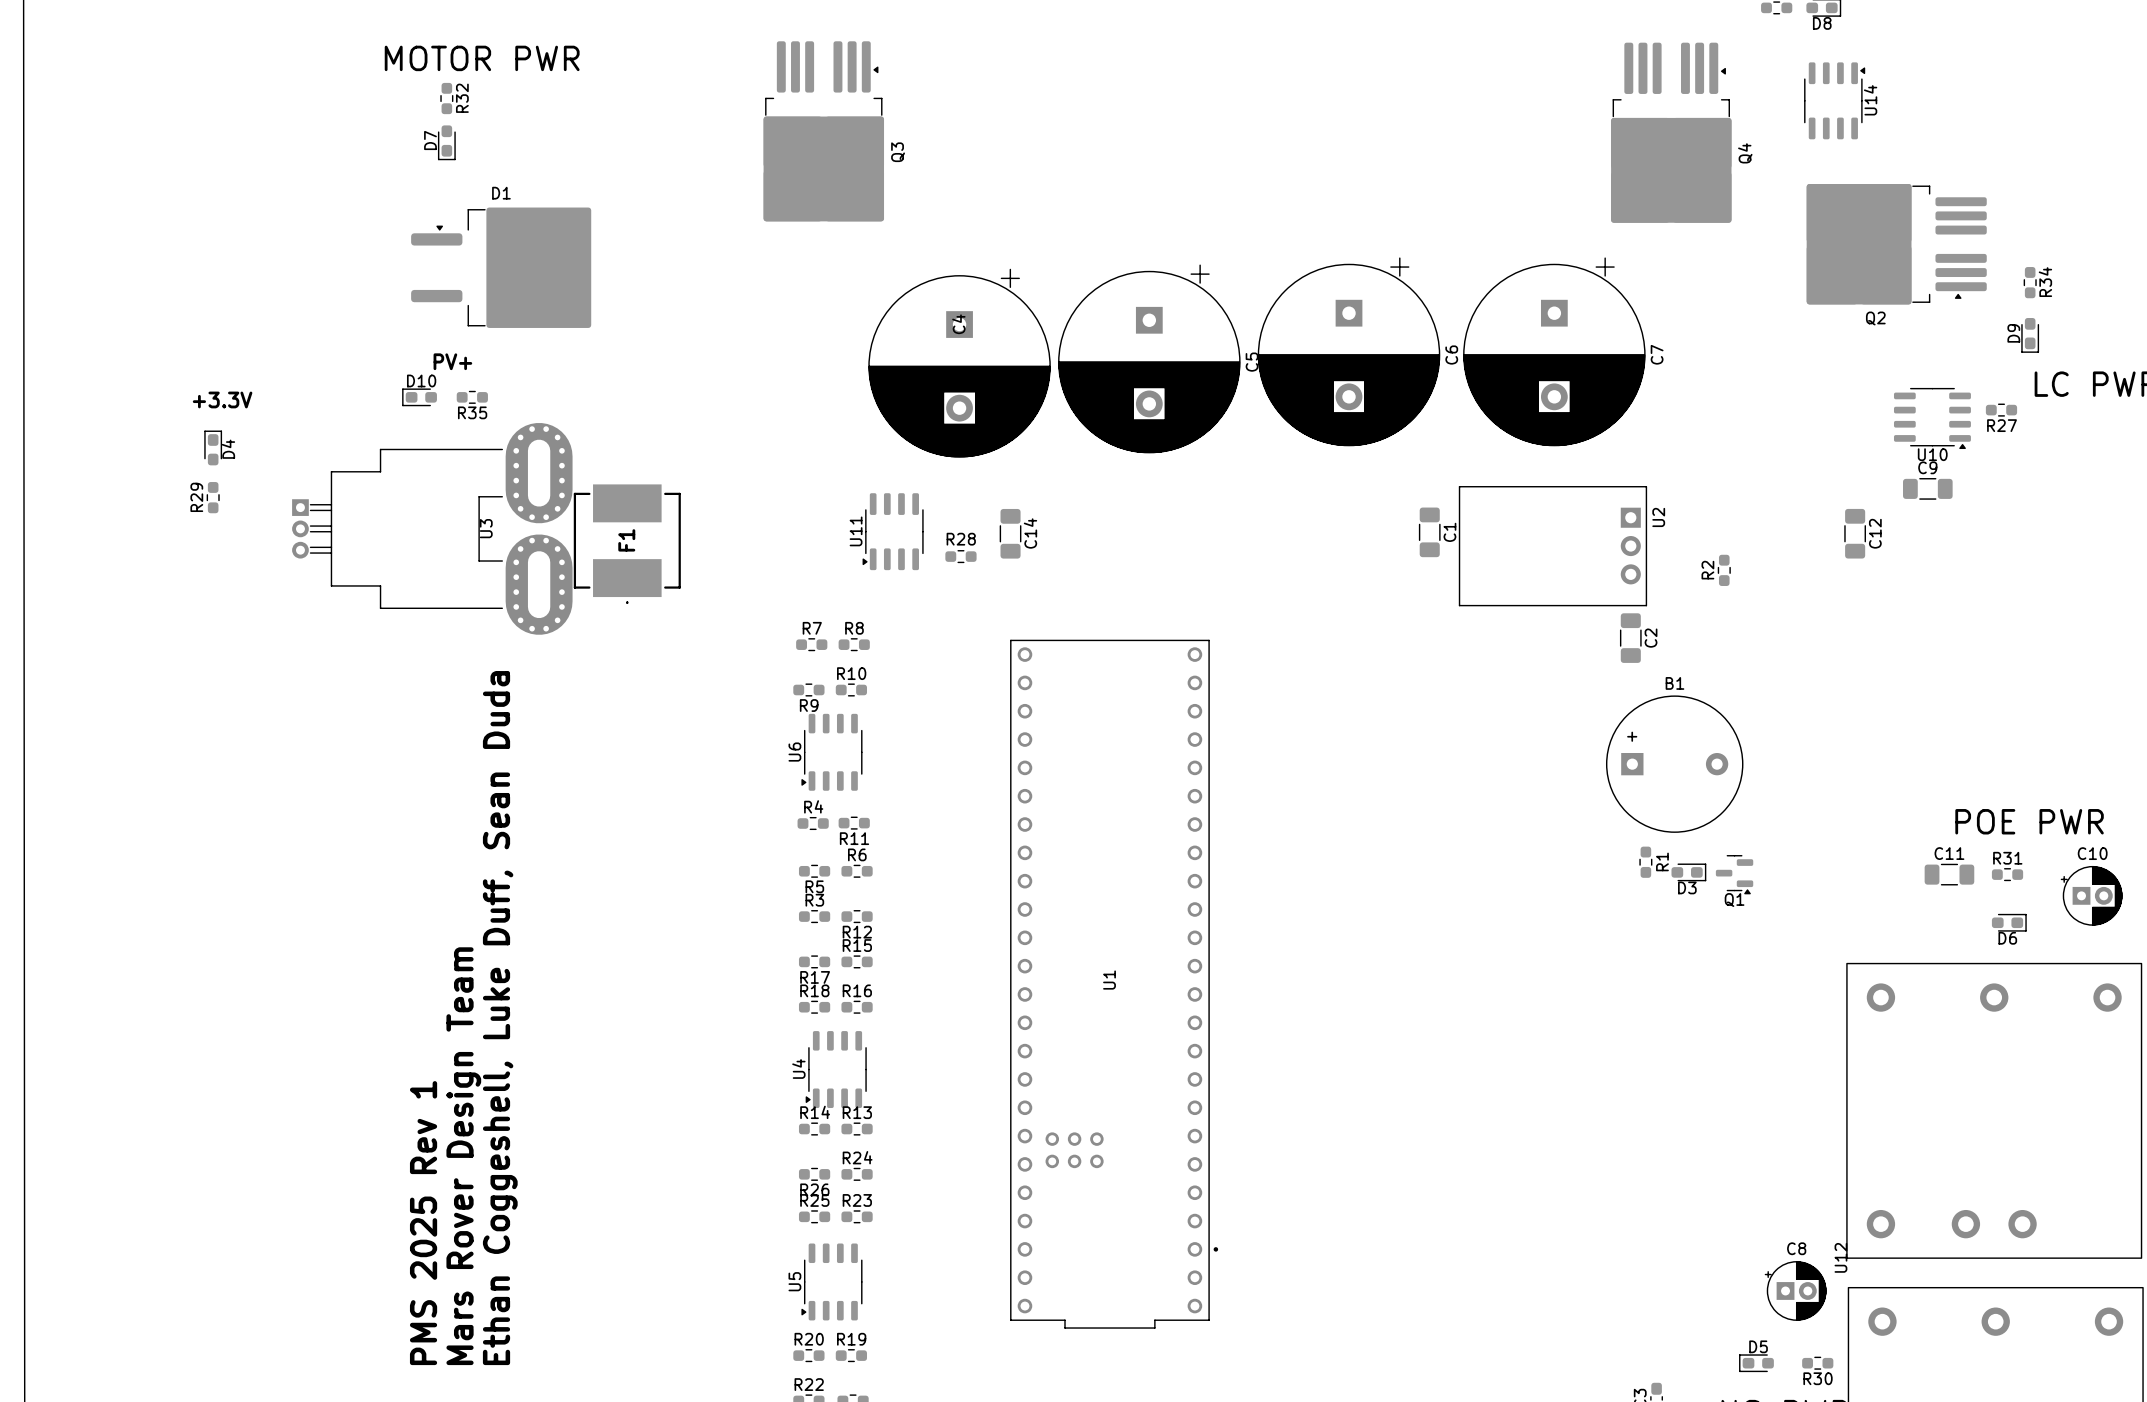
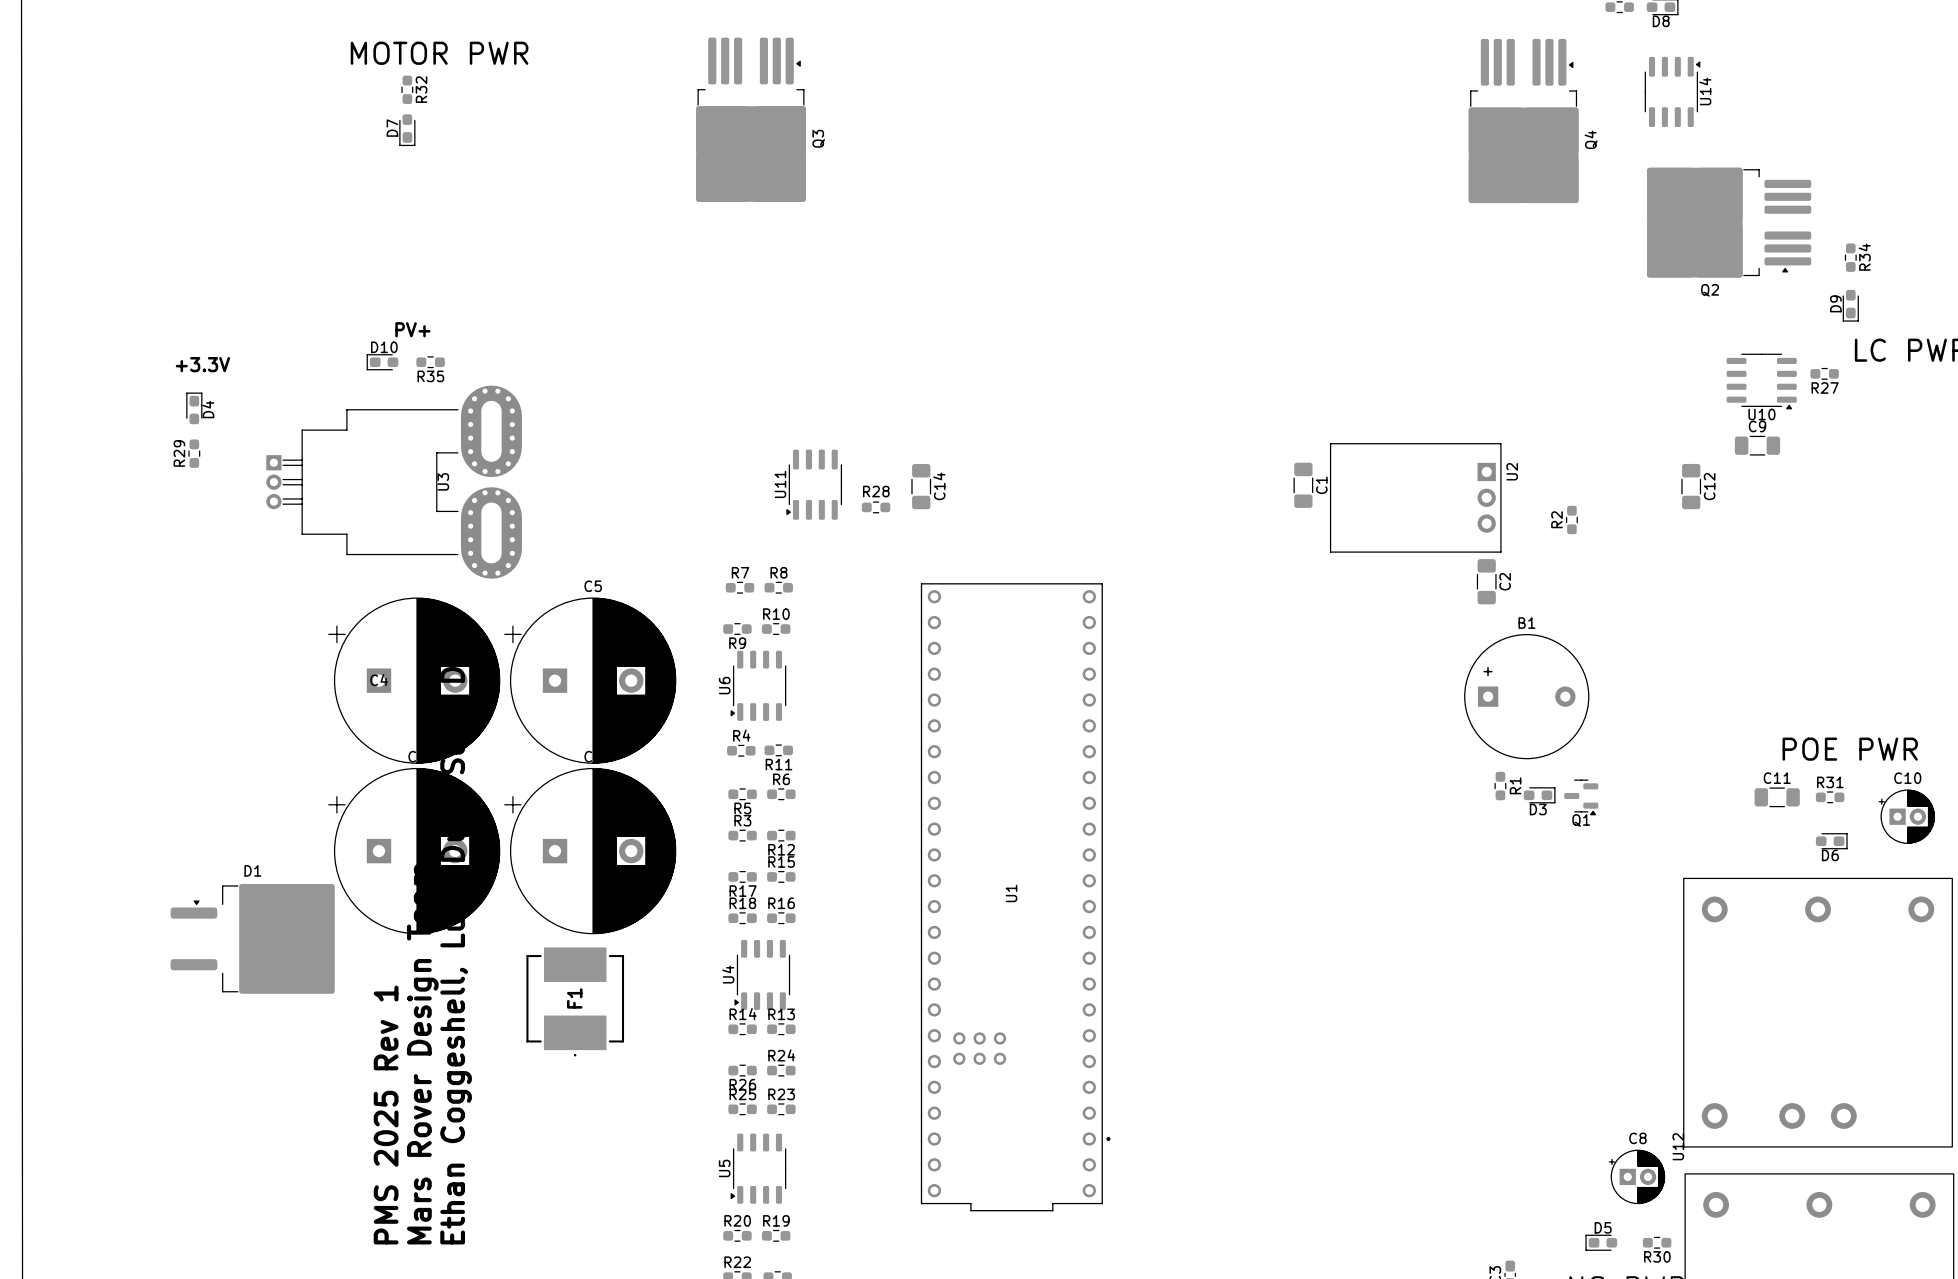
D1 position: (501, 267) -> (252, 938)
C6 rotation: 0° (1349, 351) -> 90° counterclockwise (590, 851)
C6 position: (1349, 351) -> (590, 851)
C7 rotation: 0° (1554, 351) -> 90° counterclockwise (414, 851)
C7 position: (1554, 351) -> (414, 851)
C5 rotation: 0° (1149, 358) -> 90° counterclockwise (590, 680)
C5 position: (1149, 358) -> (590, 680)
C4 rotation: 0° (959, 363) -> 90° counterclockwise (414, 680)
C4 position: (959, 363) -> (414, 680)
F1 position: (627, 544) -> (575, 1001)

